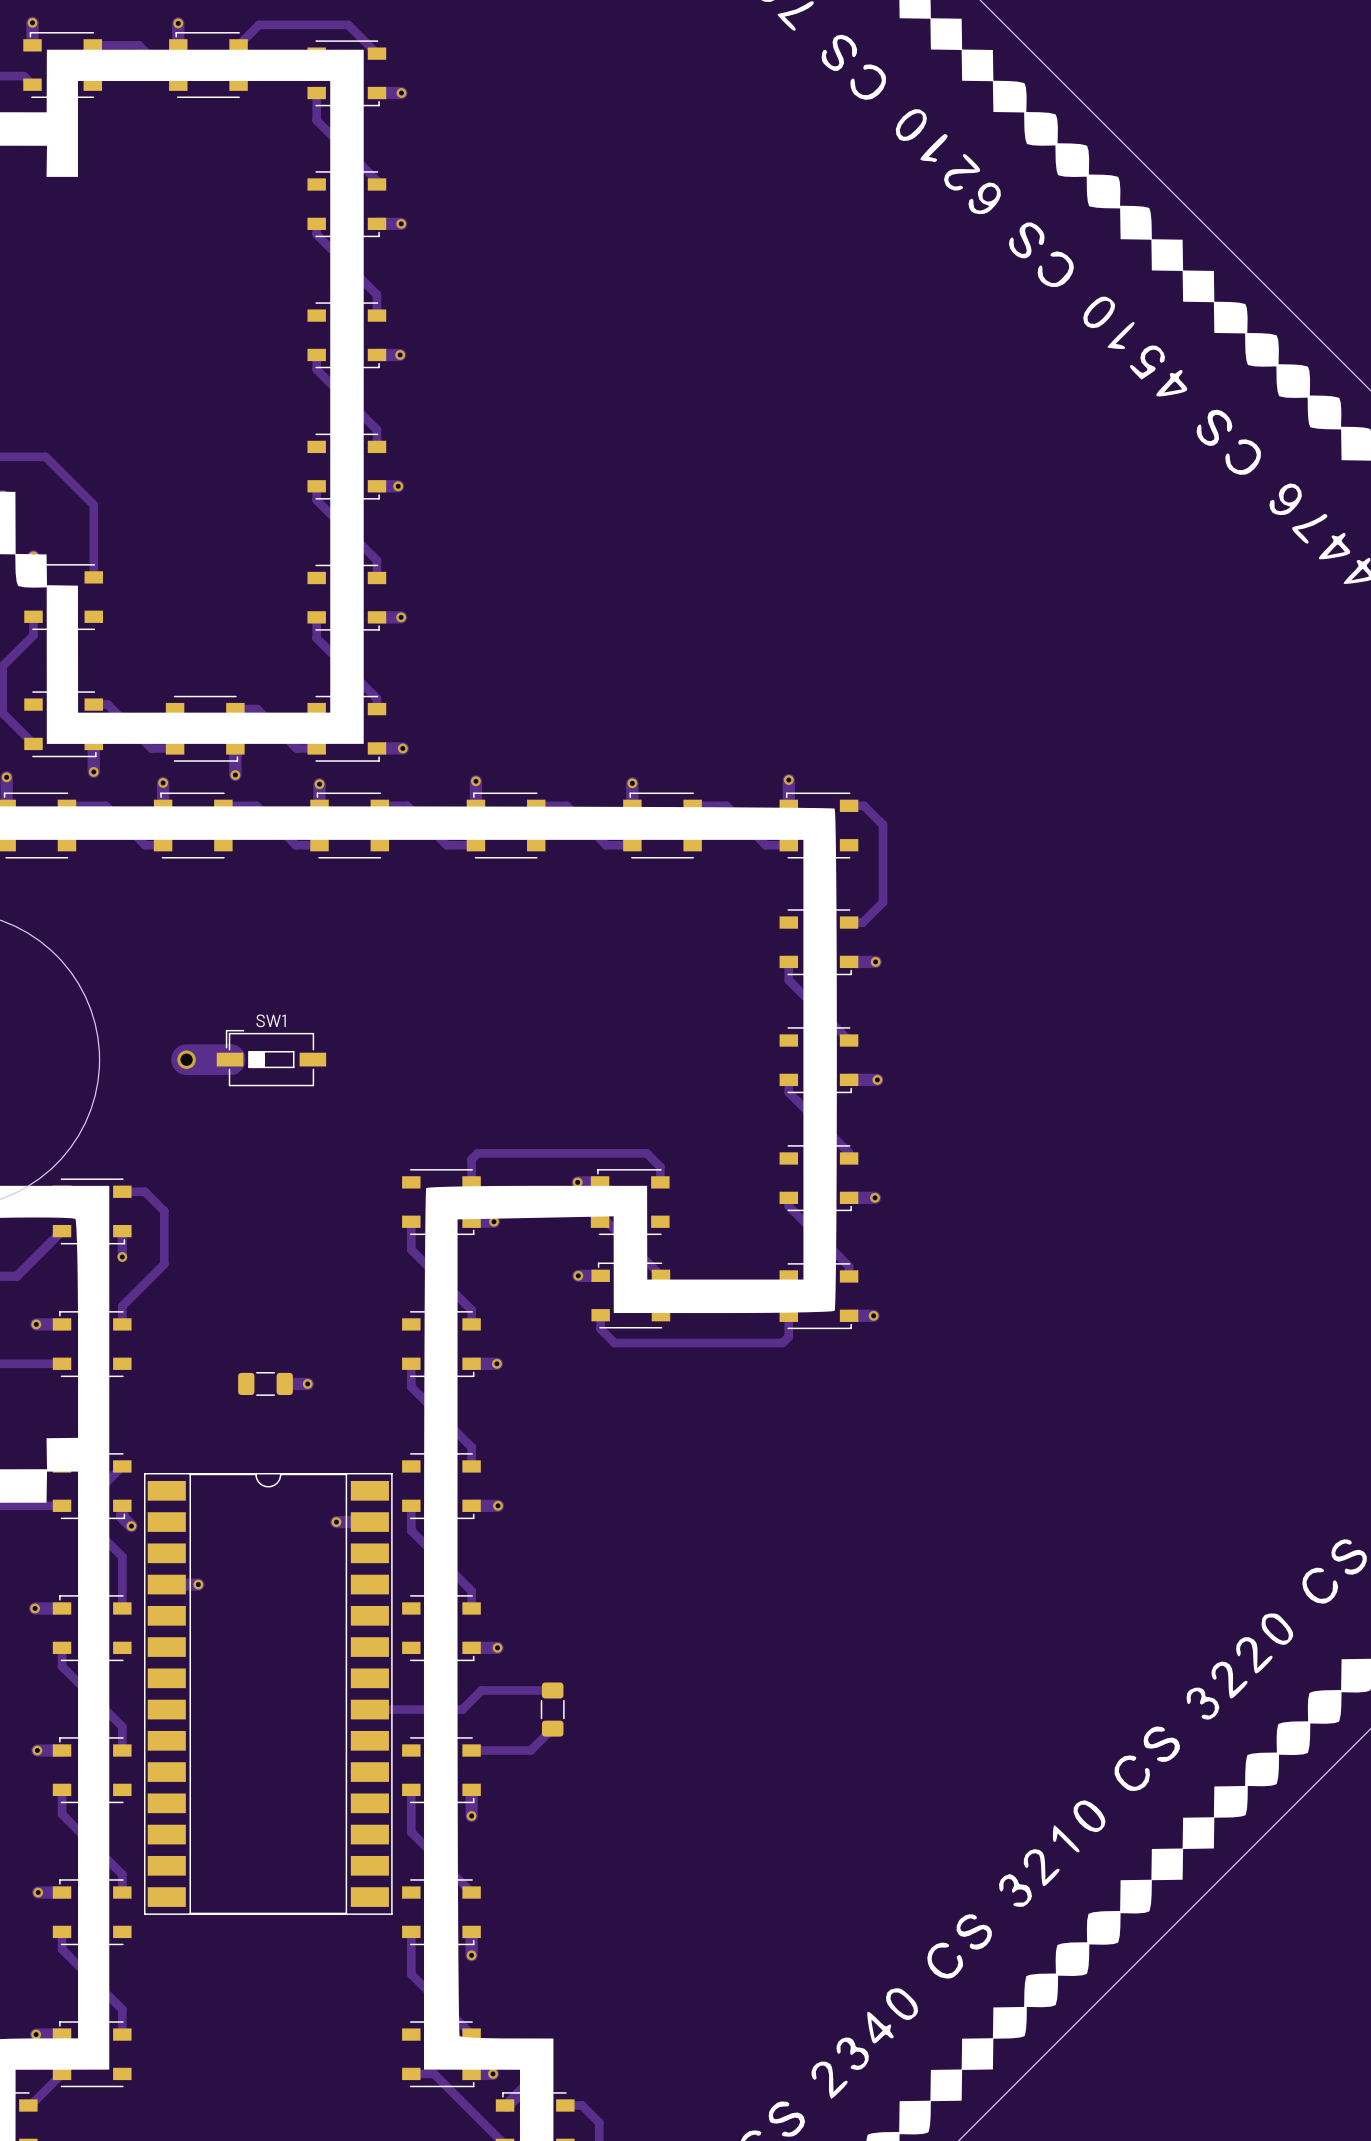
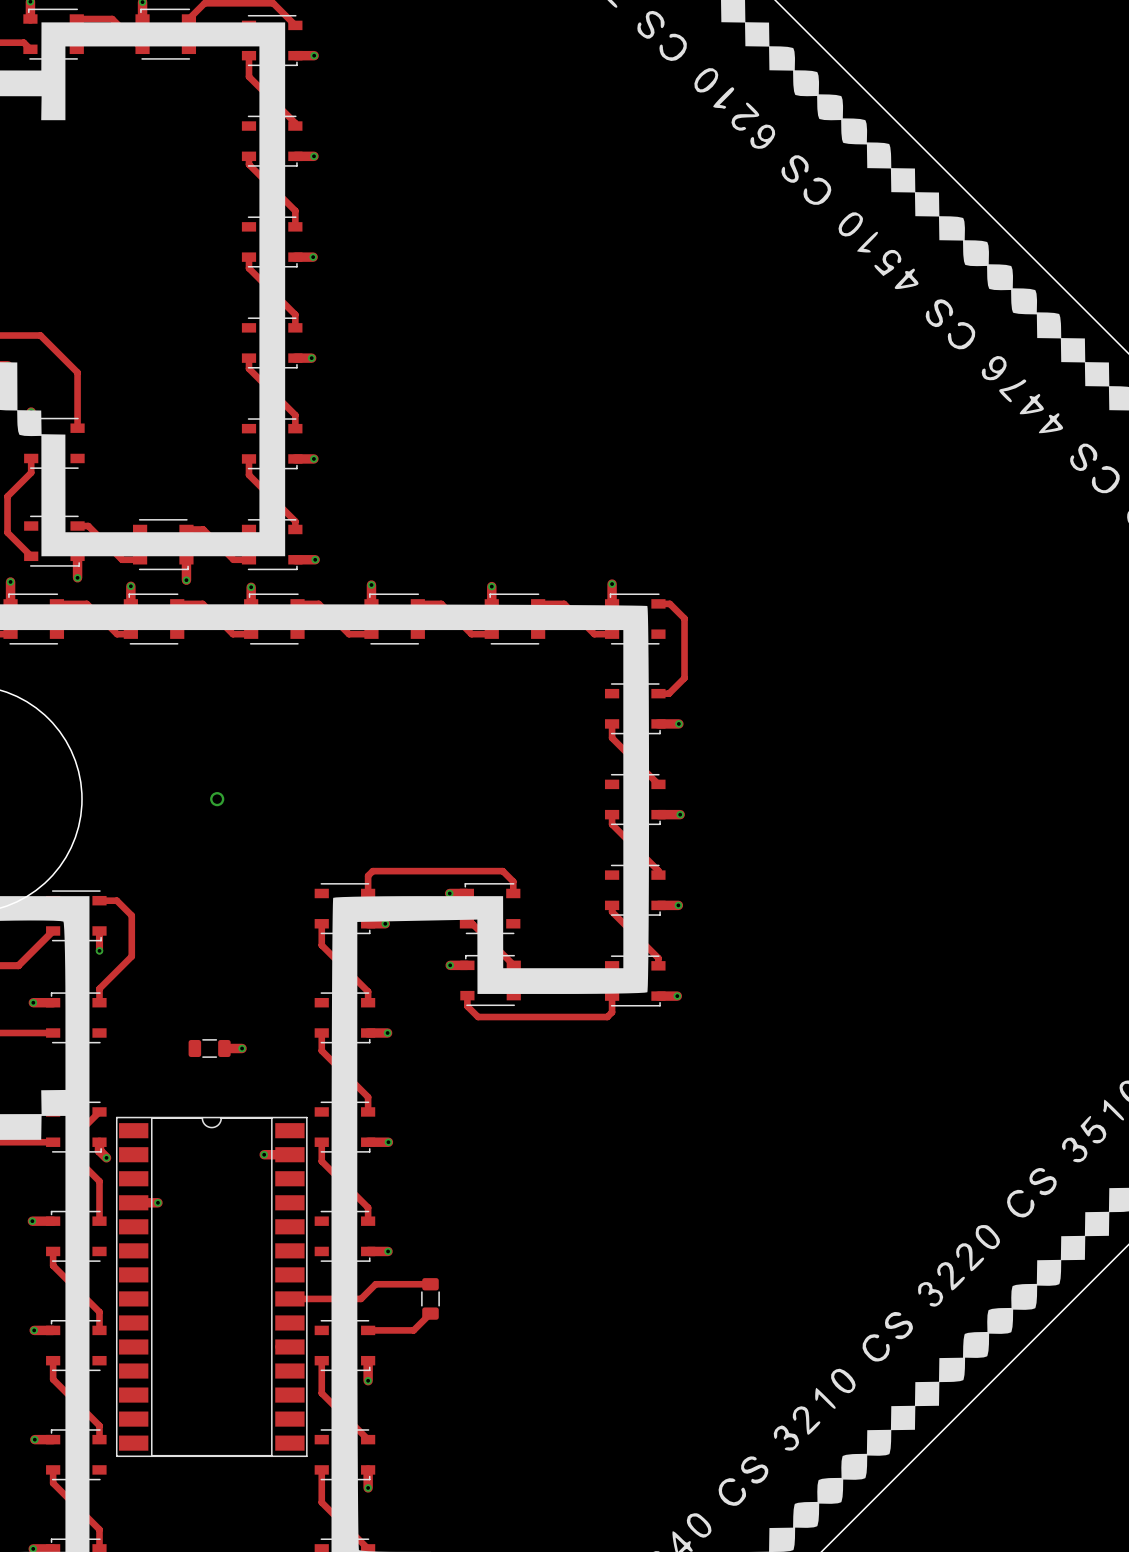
SW1: (271, 1058) -> none
track: (186, 1059) (229, 1059) -> none
via: (186, 1059) -> none
via: none -> (217, 799)

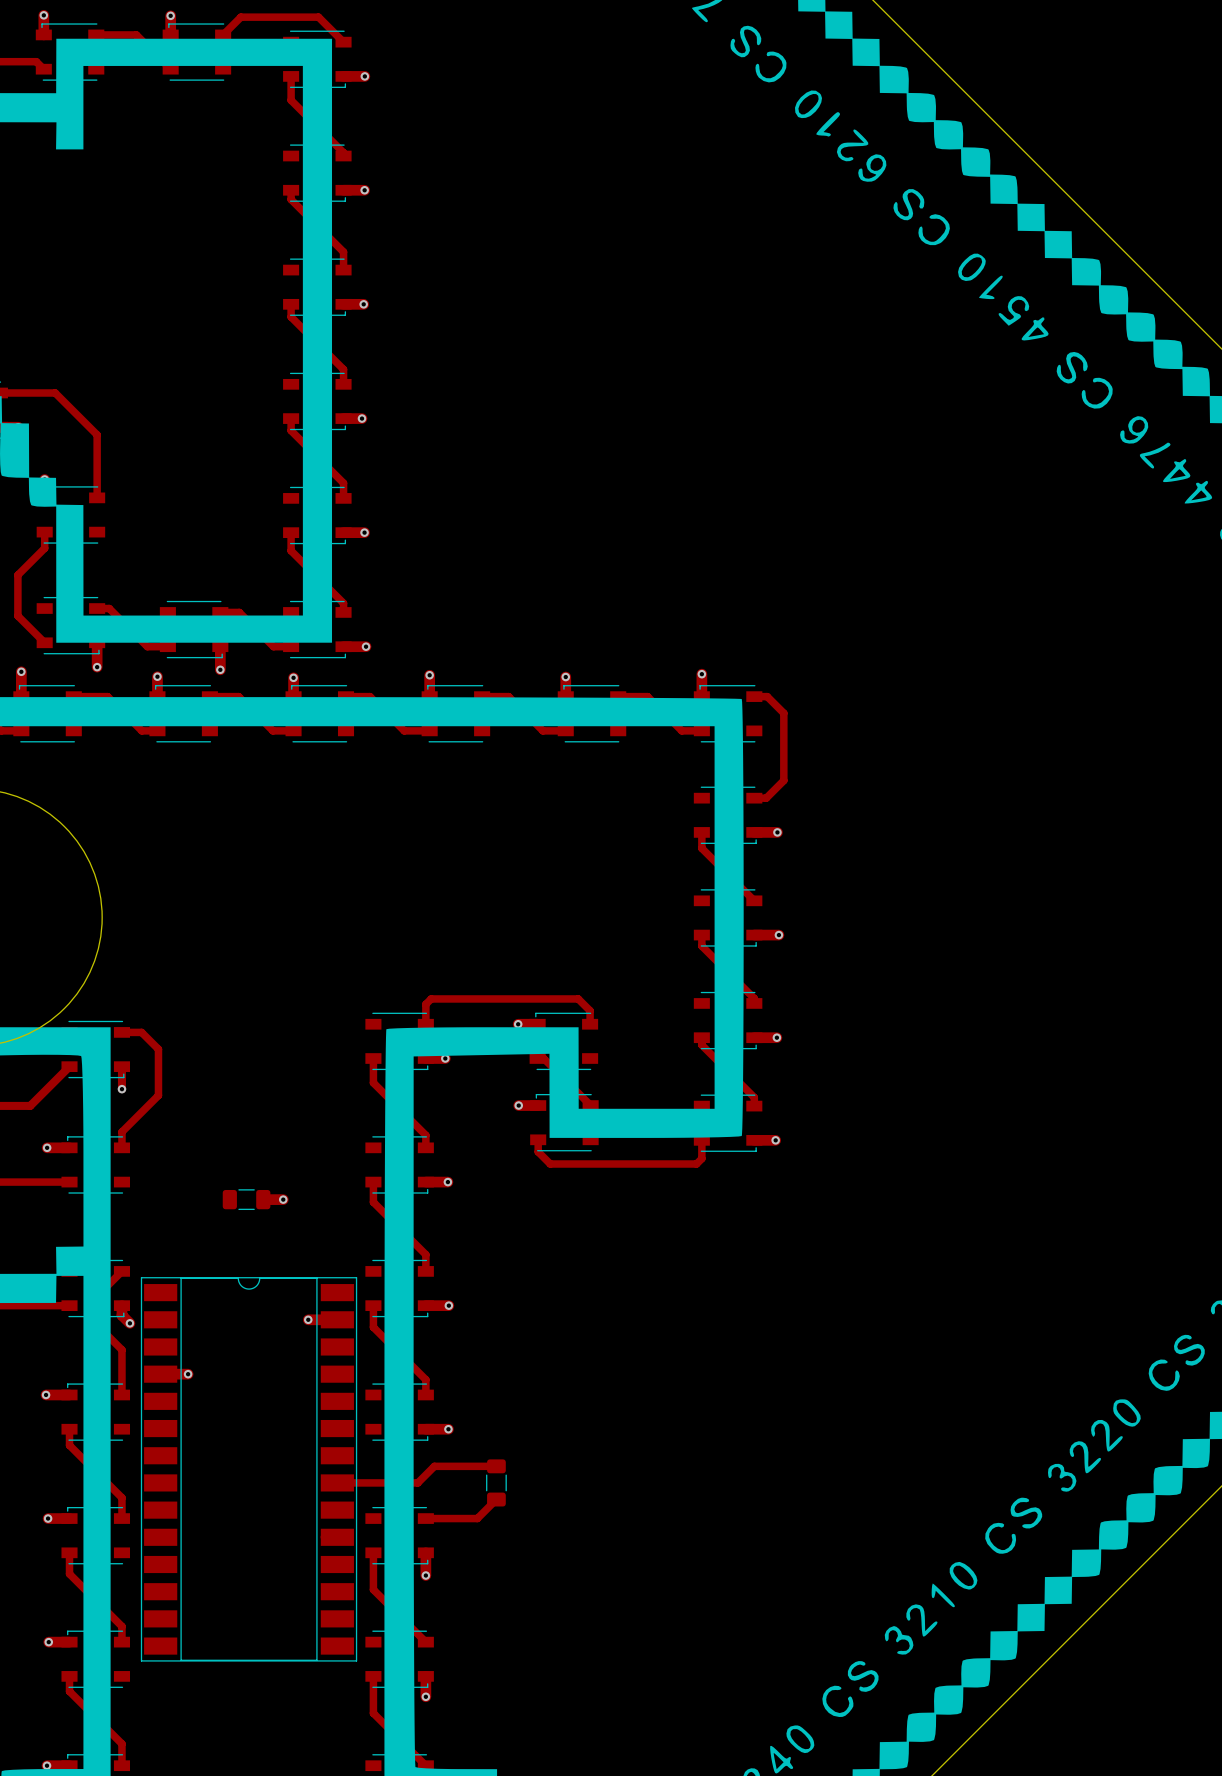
via: (217, 799) -> none

